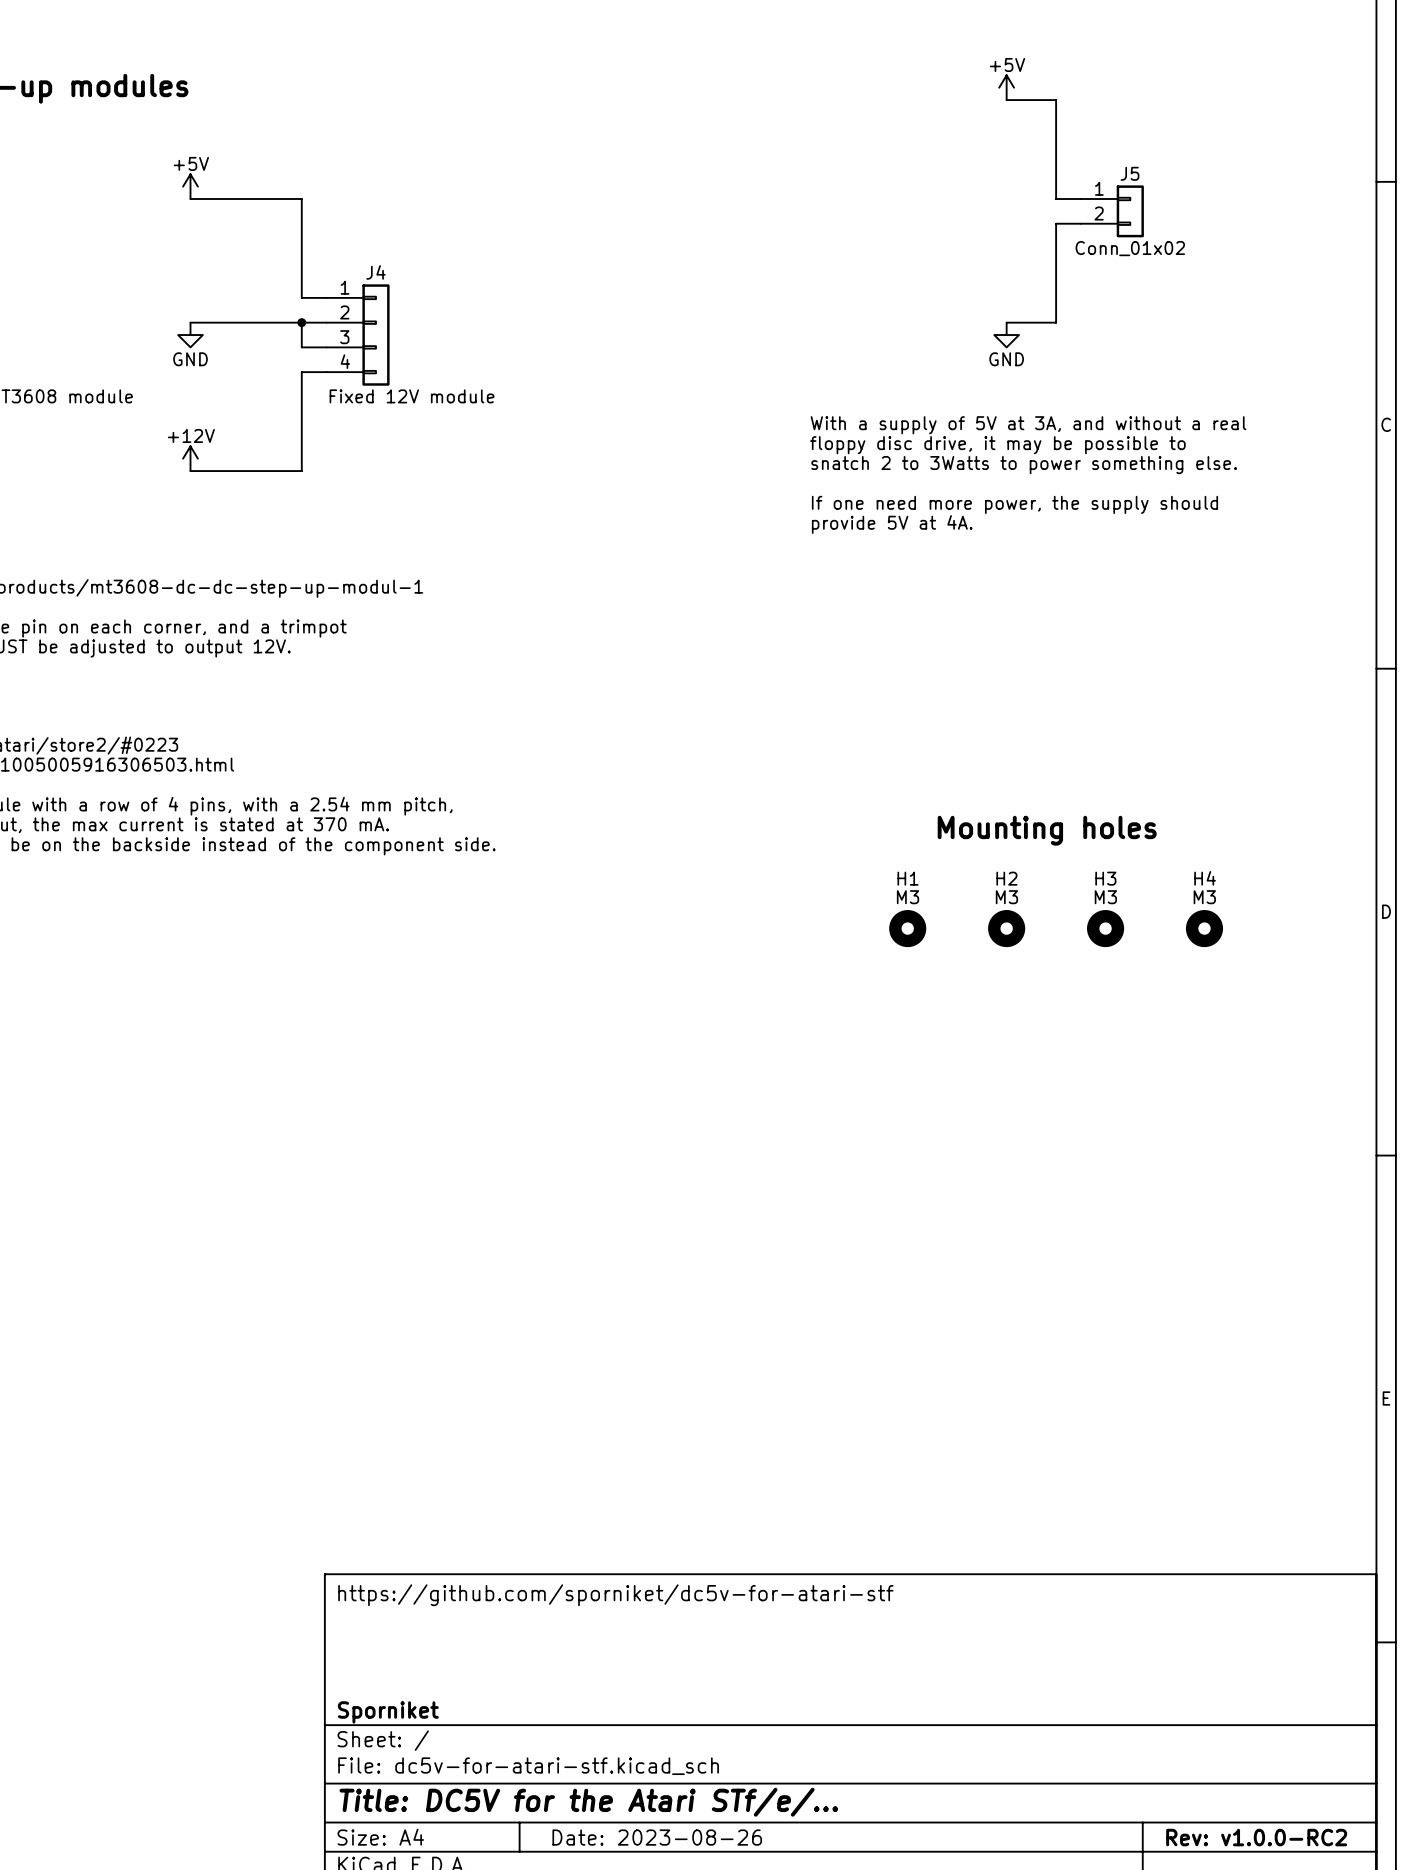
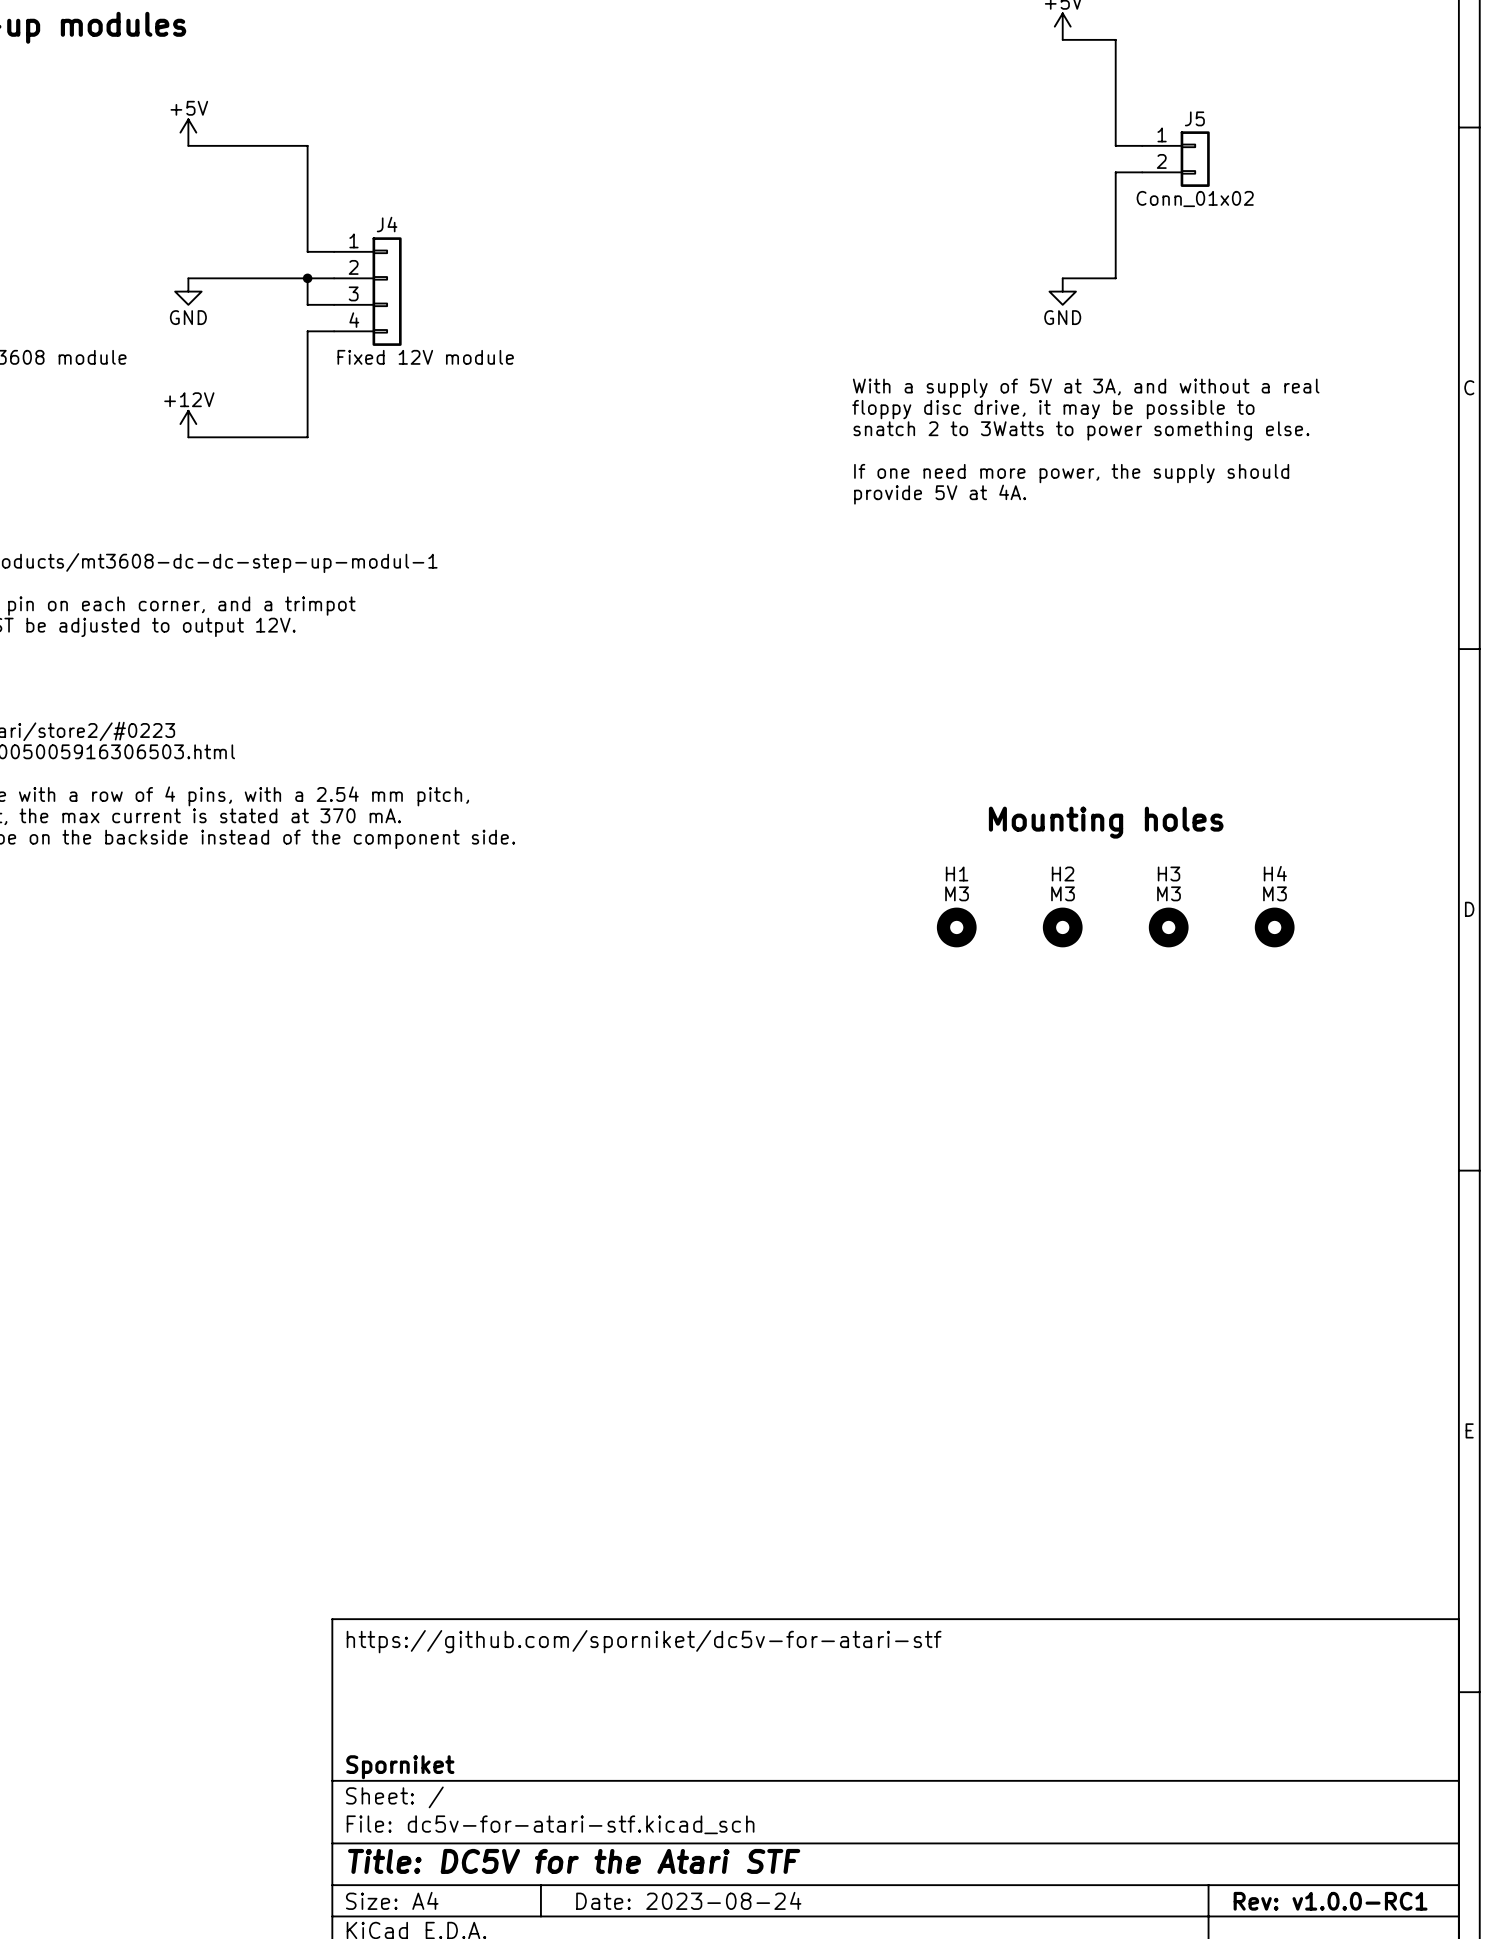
title block: Title: DC5V for the Atari STf/e/... (588, 1802) -> Title: DC5V for the Atari STF (574, 1861)
title block: Date: 2023-08-26 (657, 1837) -> Date: 2023-08-24 (688, 1900)
title block: Rev: v1.0.0-RC2 (1256, 1837) -> Rev: v1.0.0-RC1 (1330, 1901)

